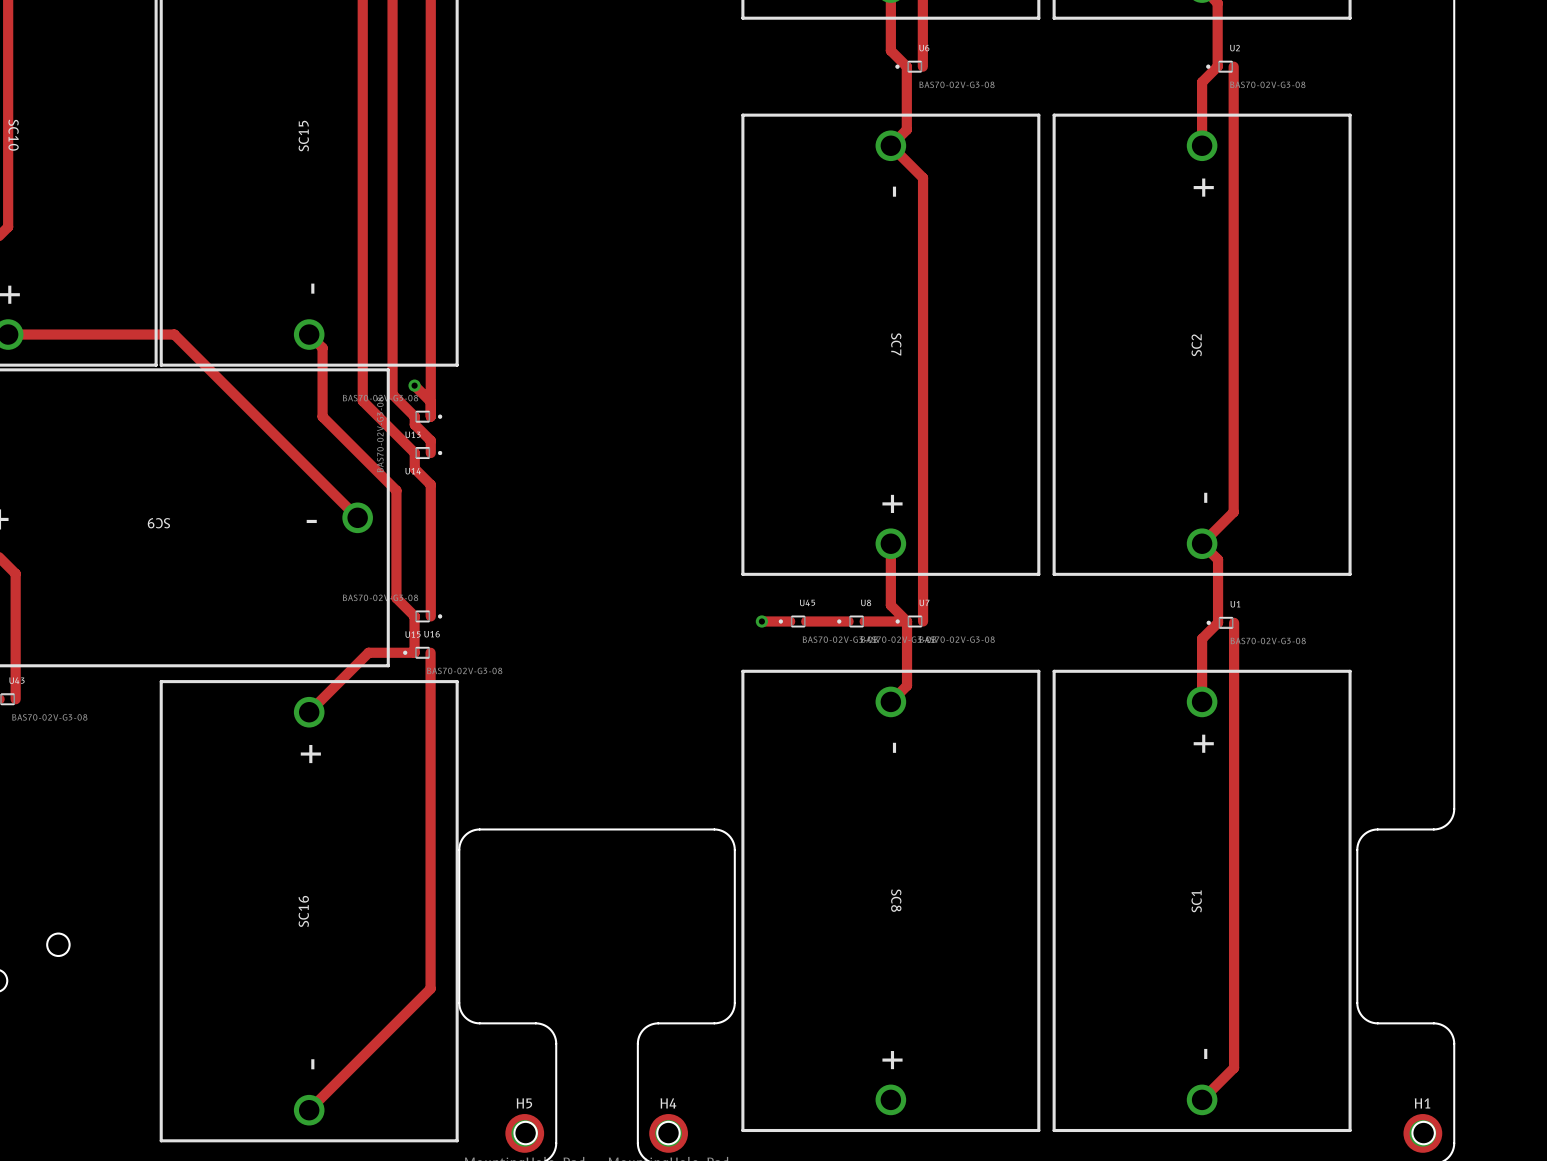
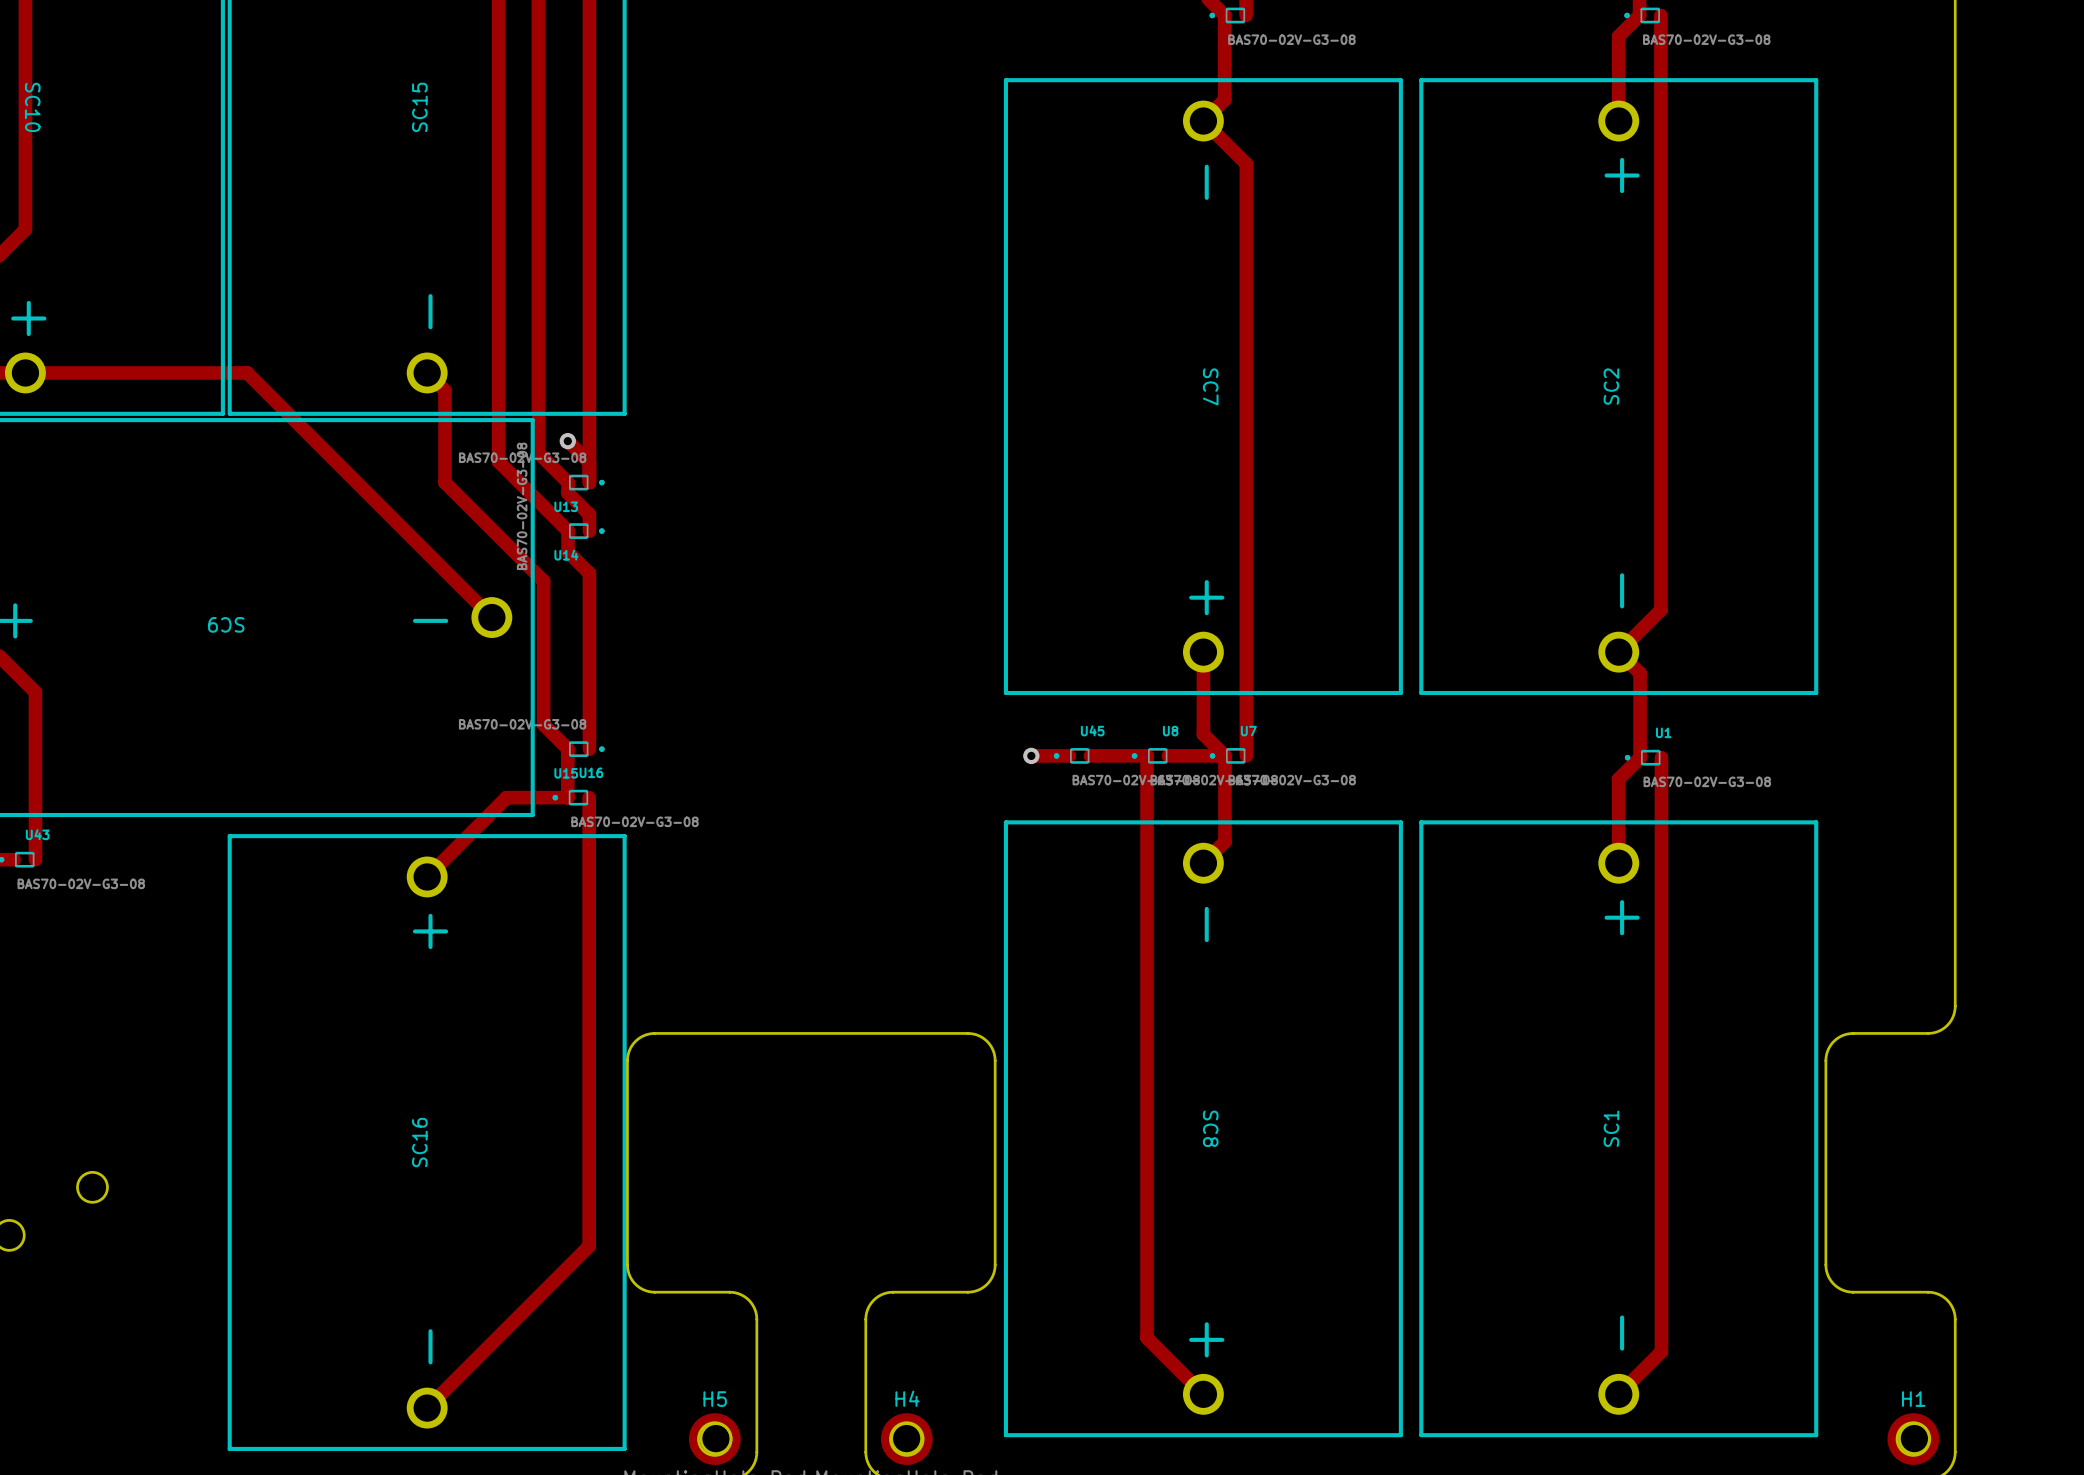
track: none -> (1147, 755) (1147, 1337) (1203, 1394)

